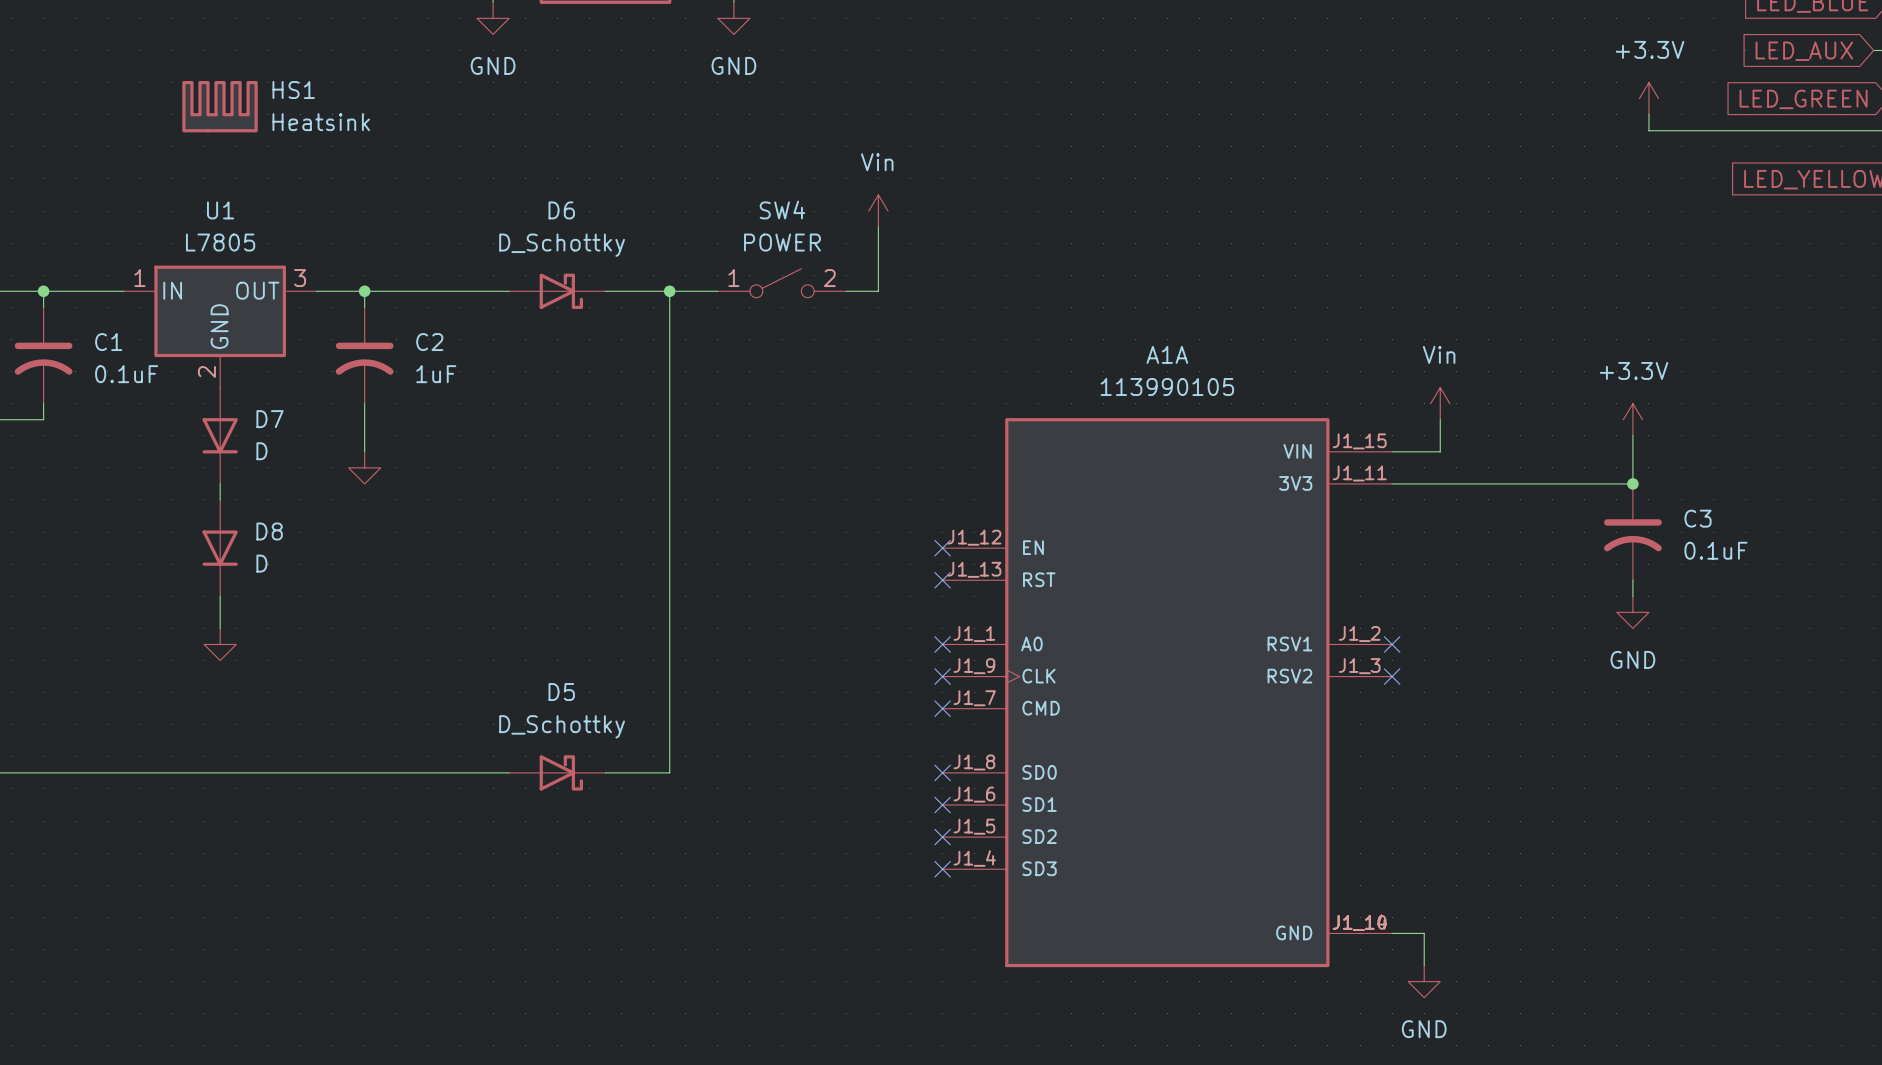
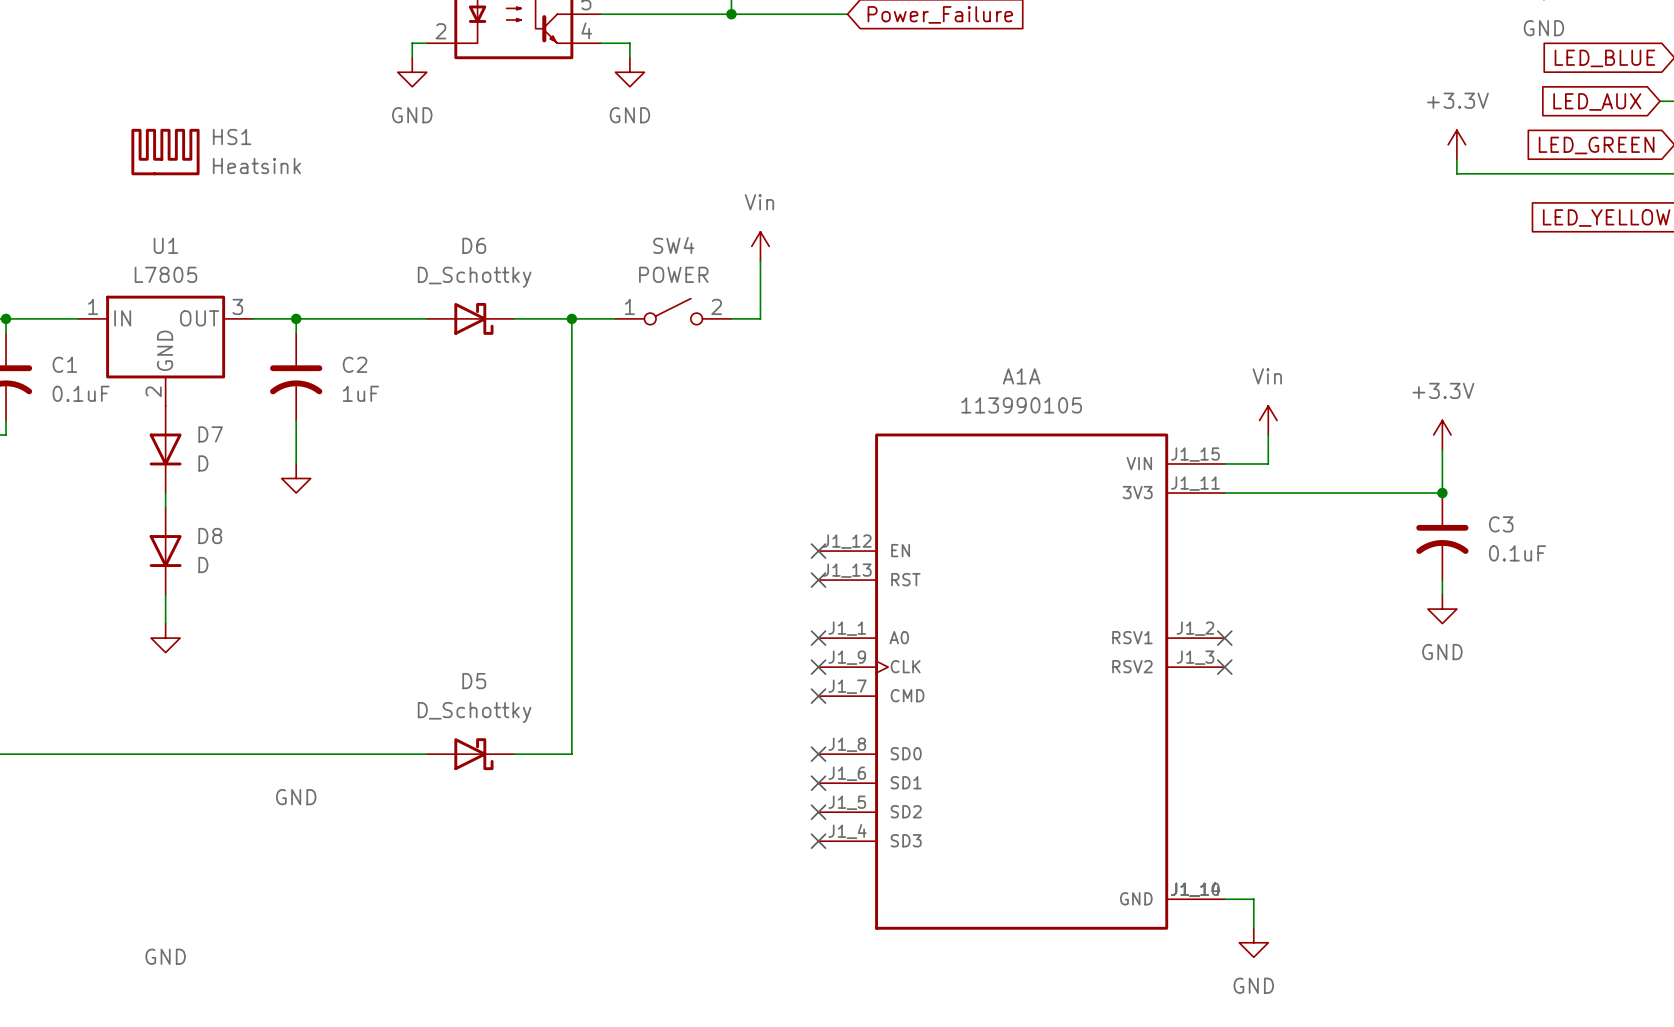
power symbol text: none -> GND (296, 797)
power symbol text: none -> GND (165, 956)

